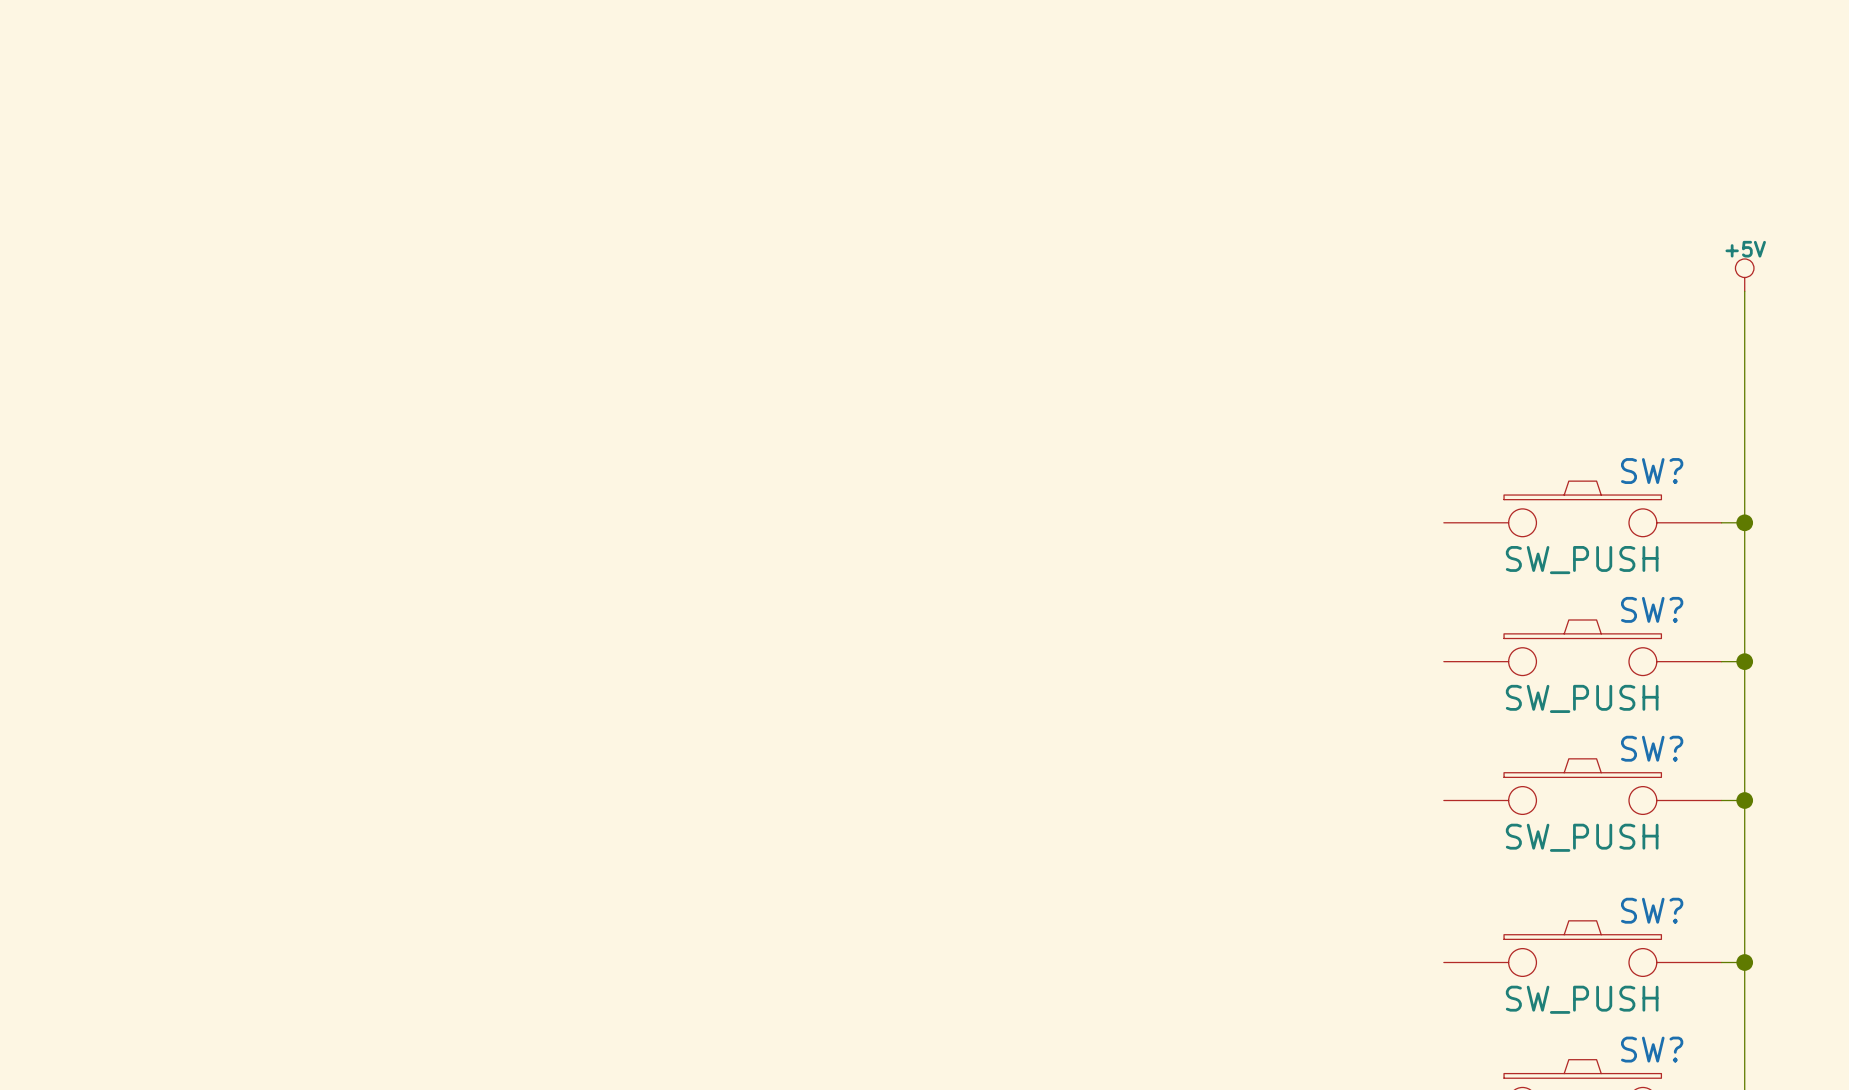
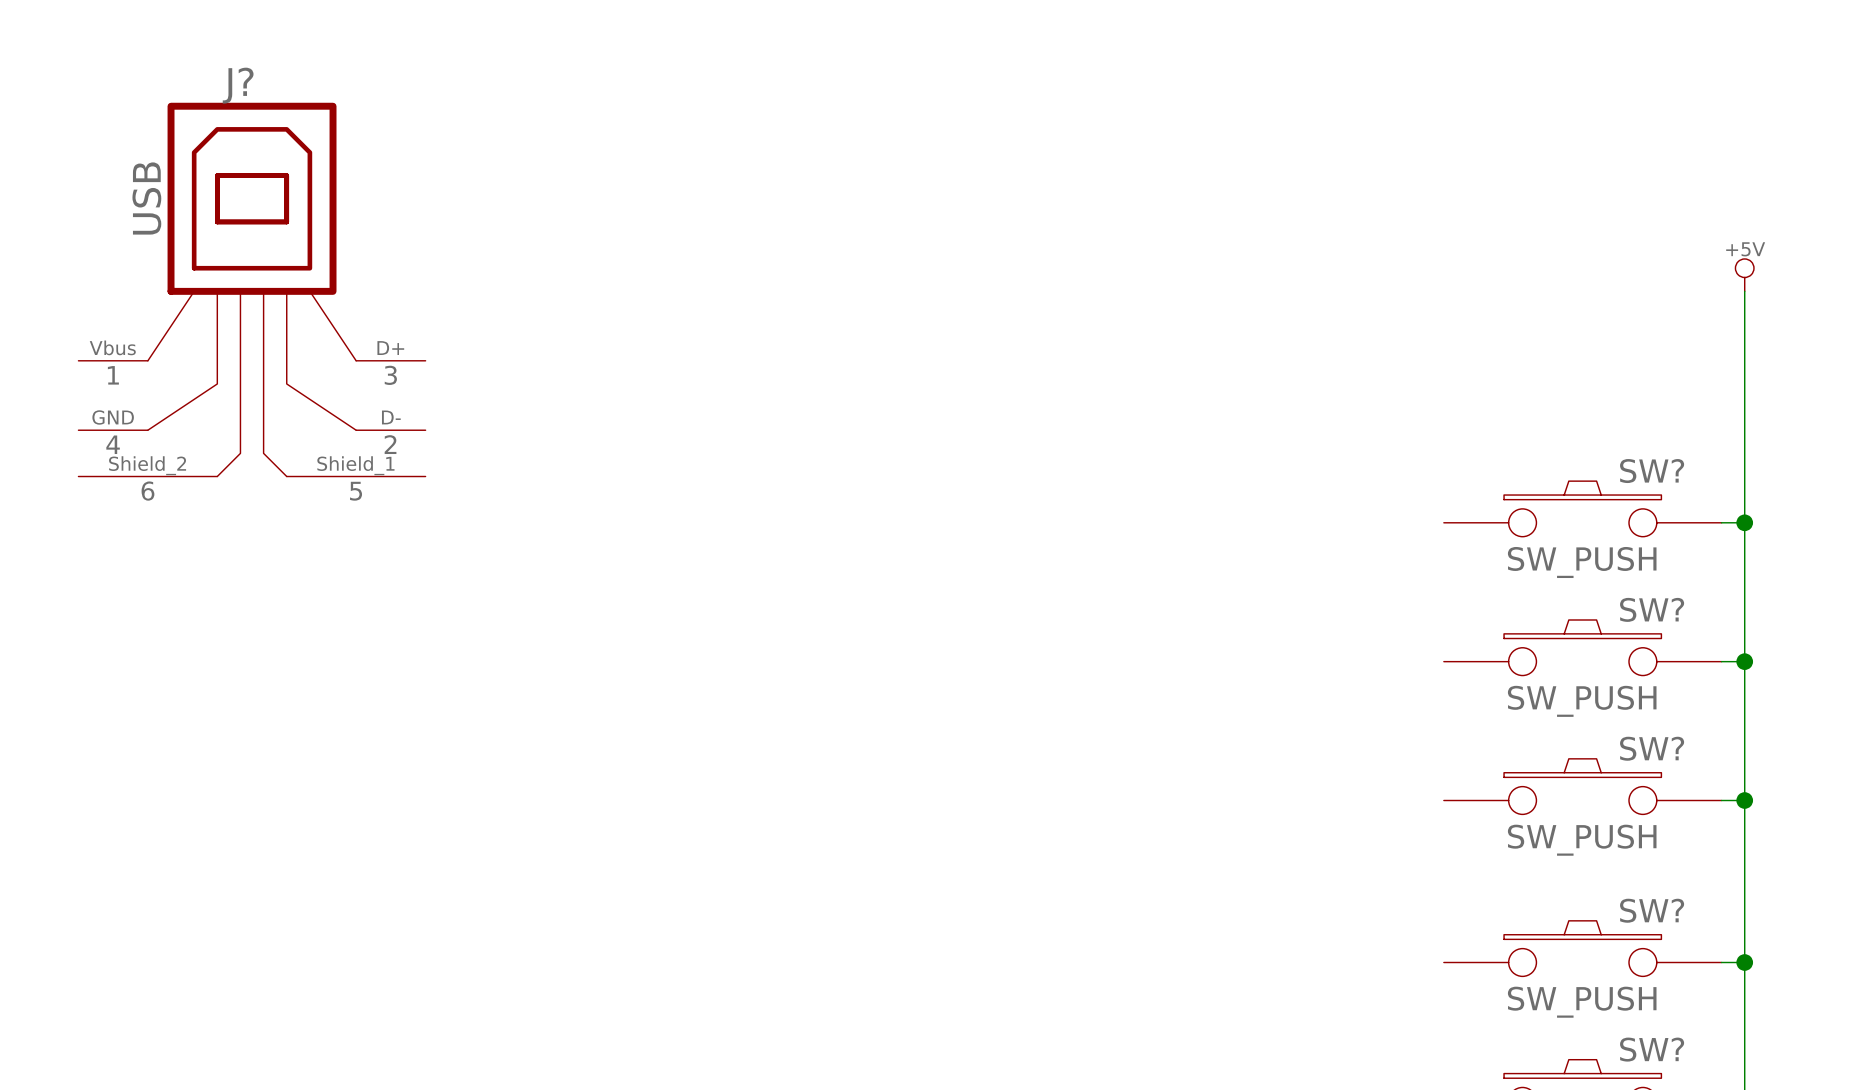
J?: none -> USB (252, 289)

